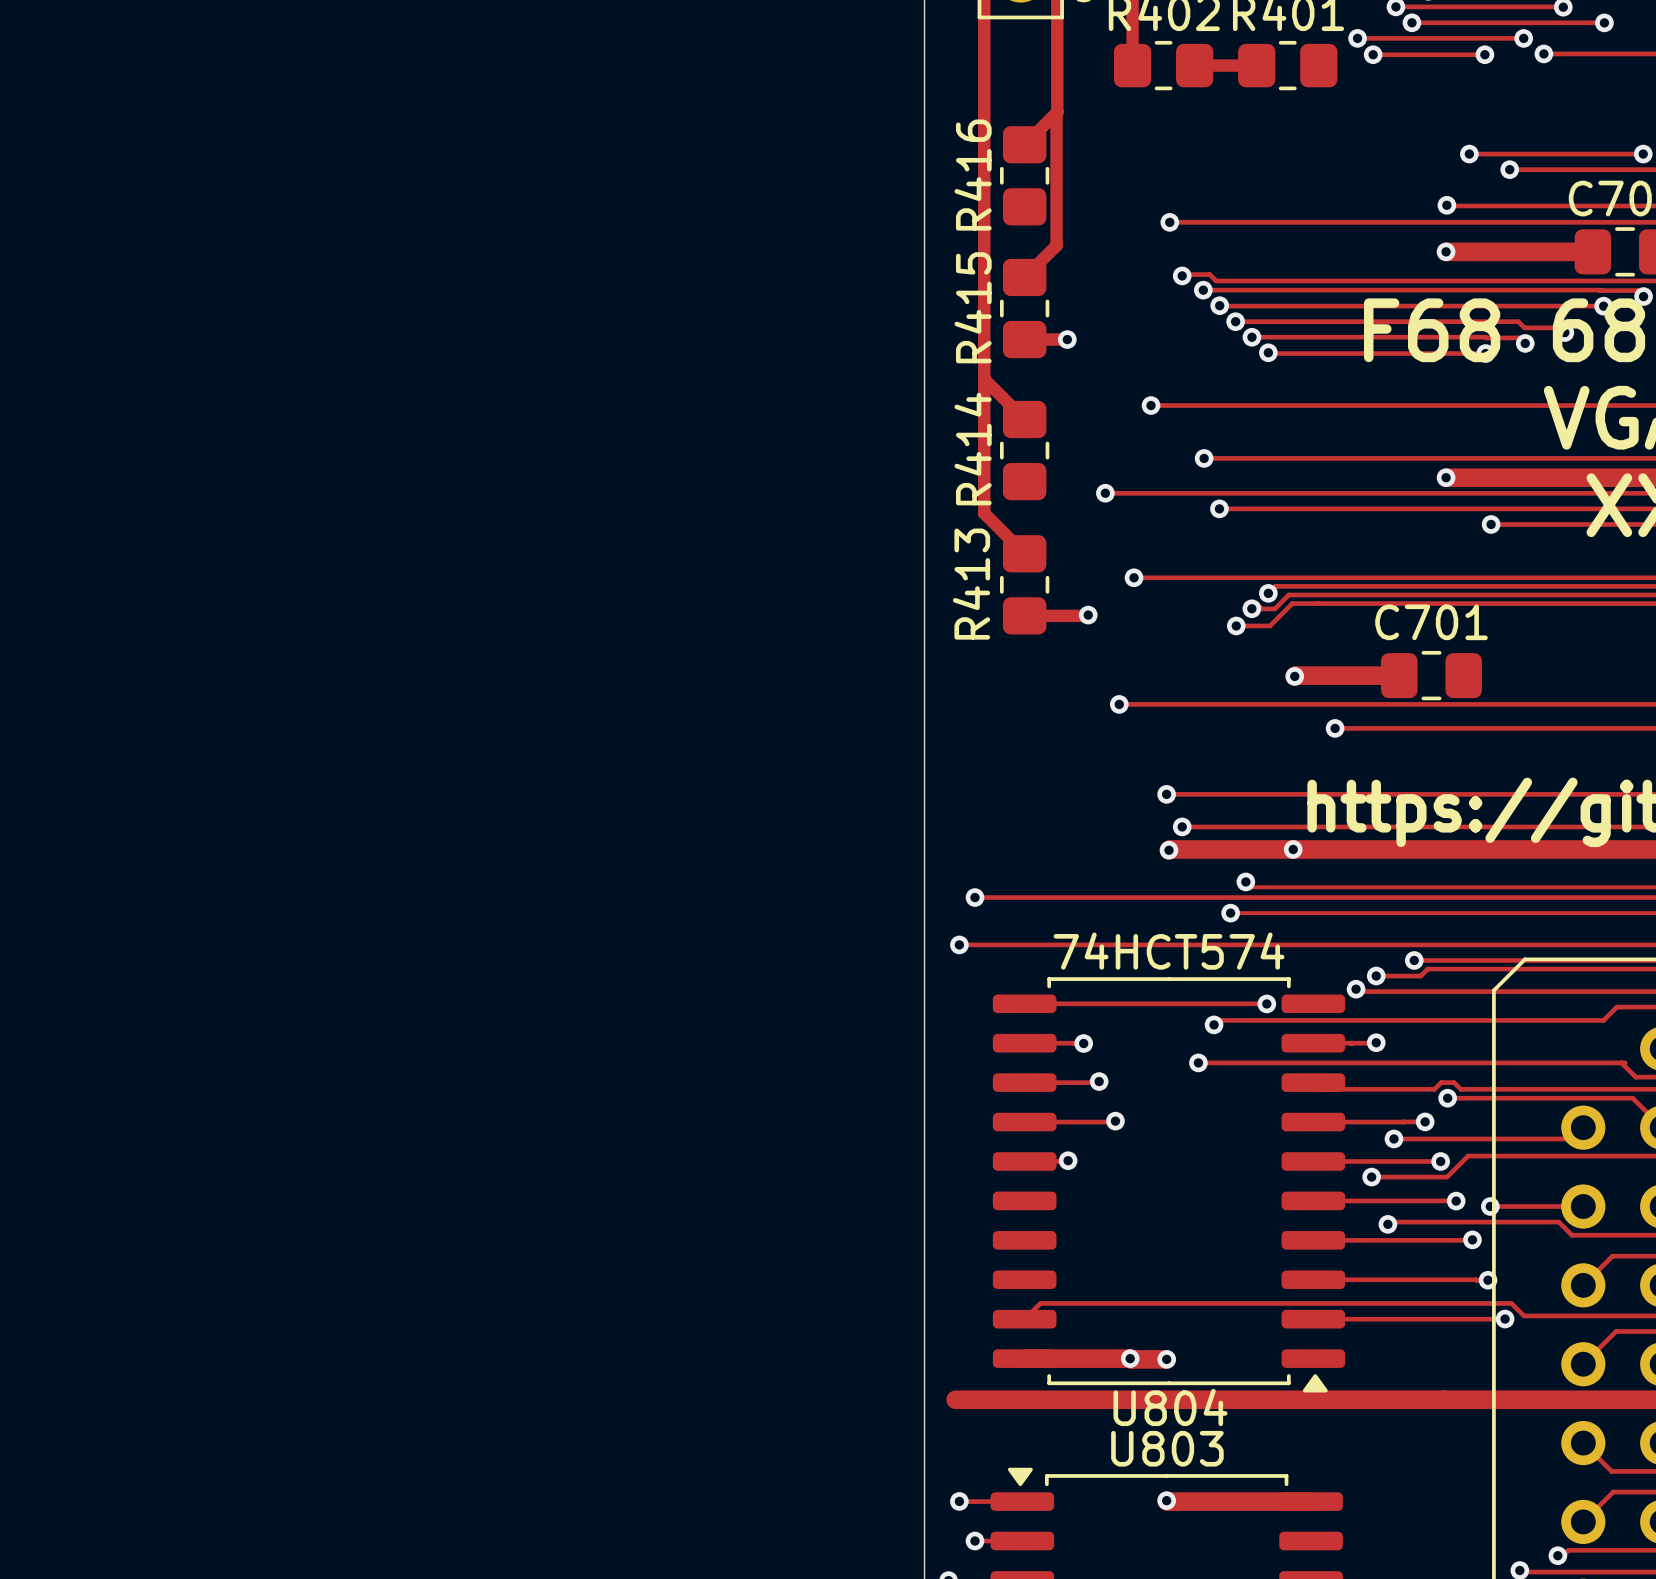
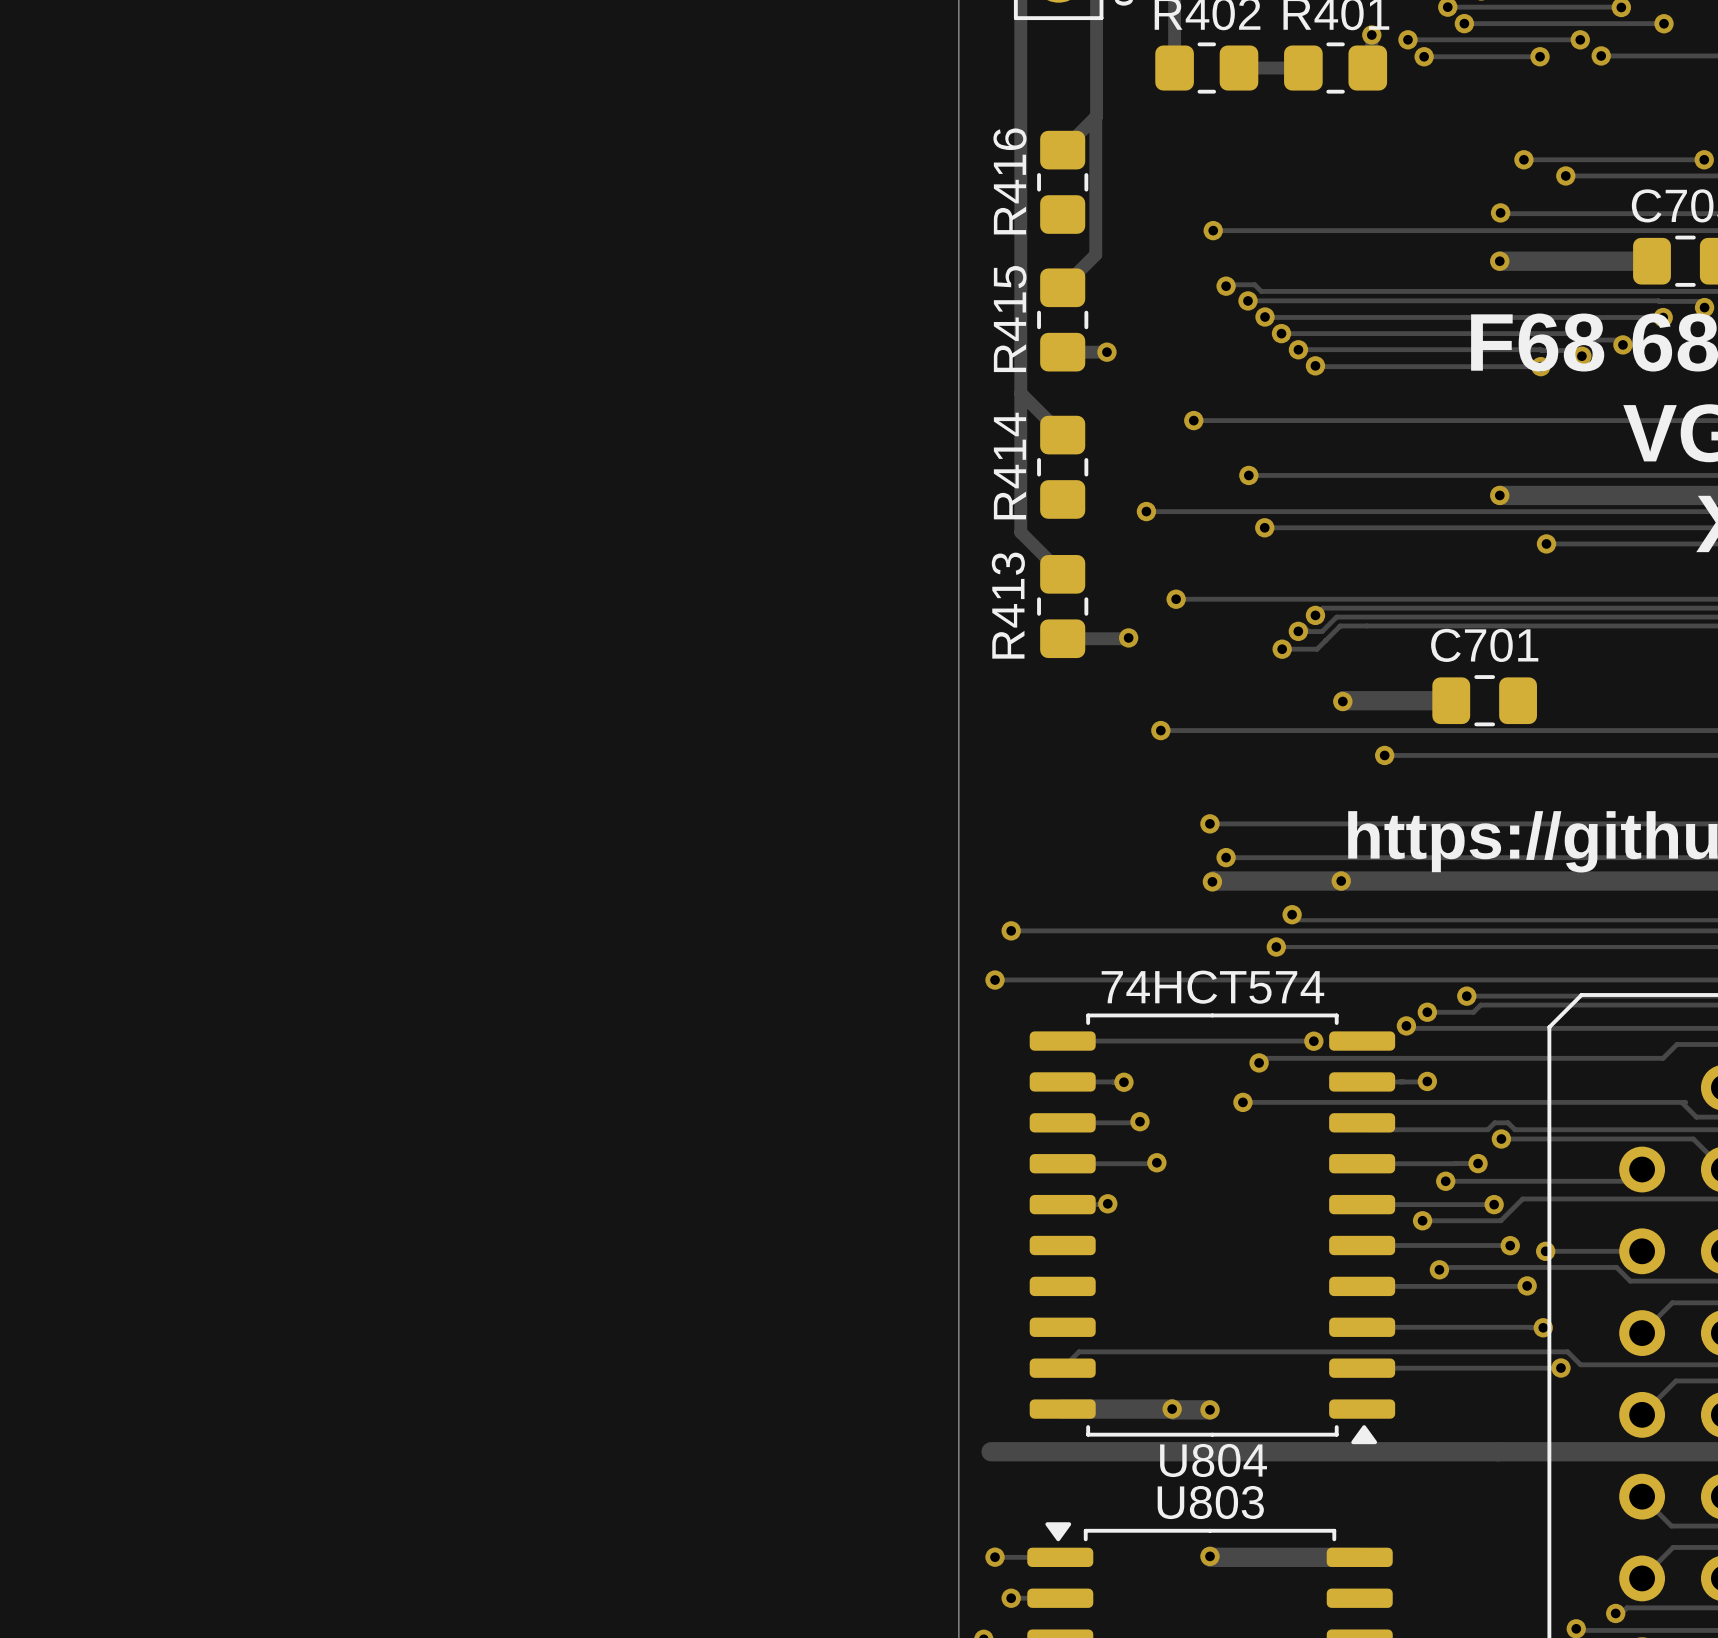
via: none -> (1371, 35)

